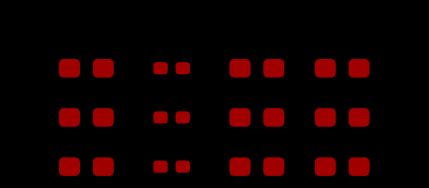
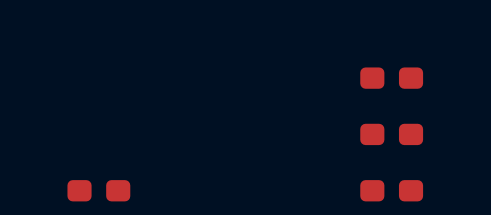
part: (86, 68) -> none
part: (171, 68) -> none
part: (256, 68) -> none
part: (86, 117) -> none
part: (171, 117) -> none
part: (256, 117) -> none
part: (171, 166) -> none
part: (256, 166) -> none

